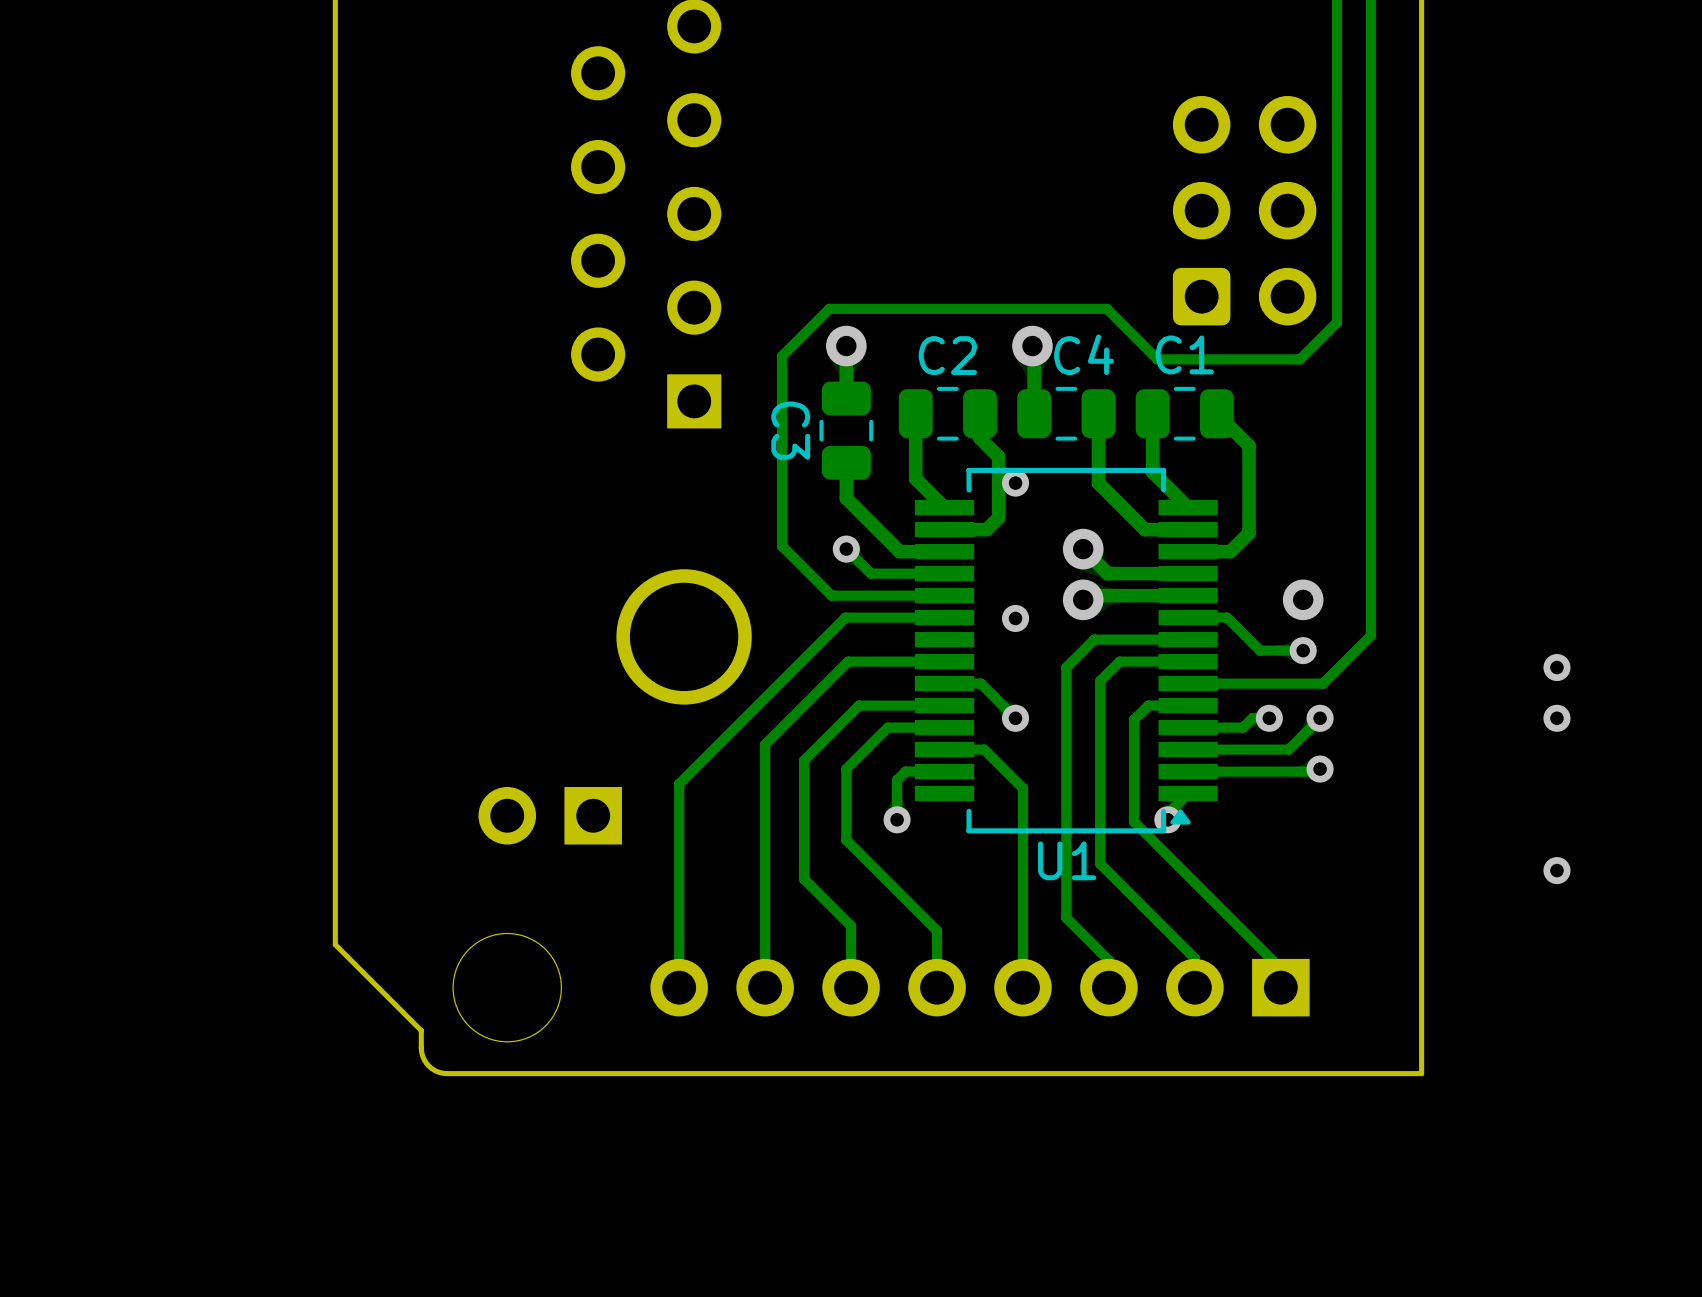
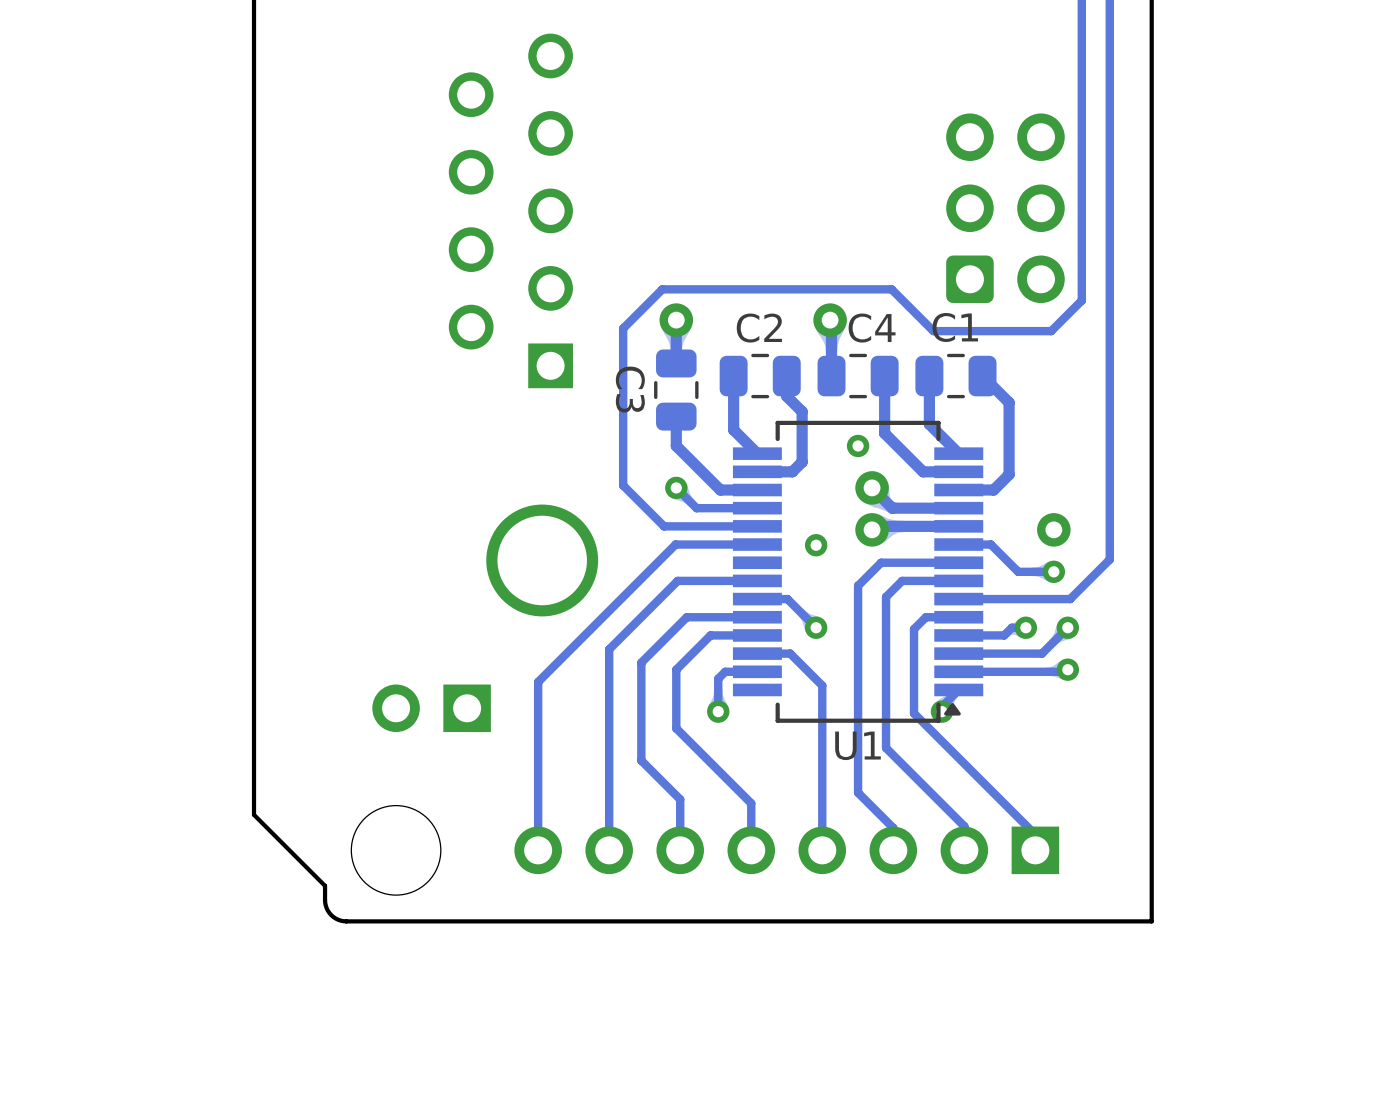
via position: (1015, 483) -> (858, 445)
via: (1556, 667) -> none
via: (1556, 718) -> none
via: (1556, 870) -> none

